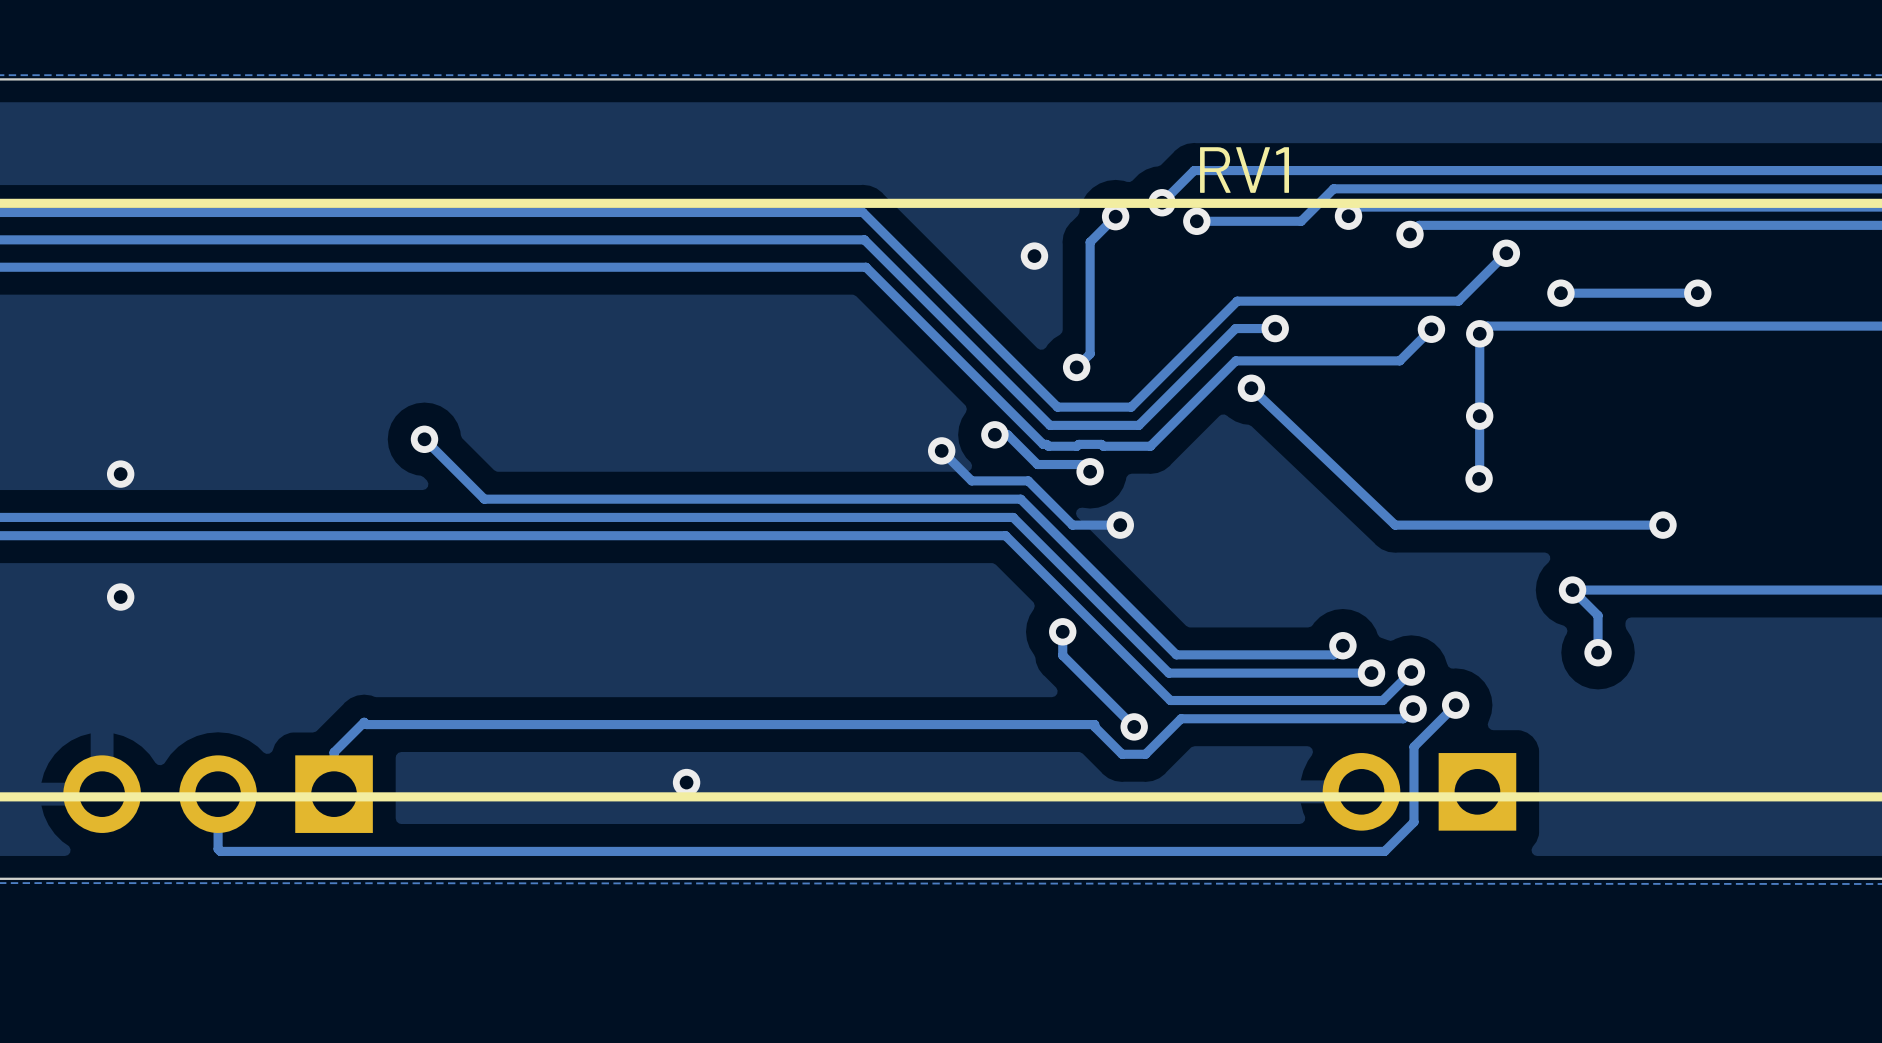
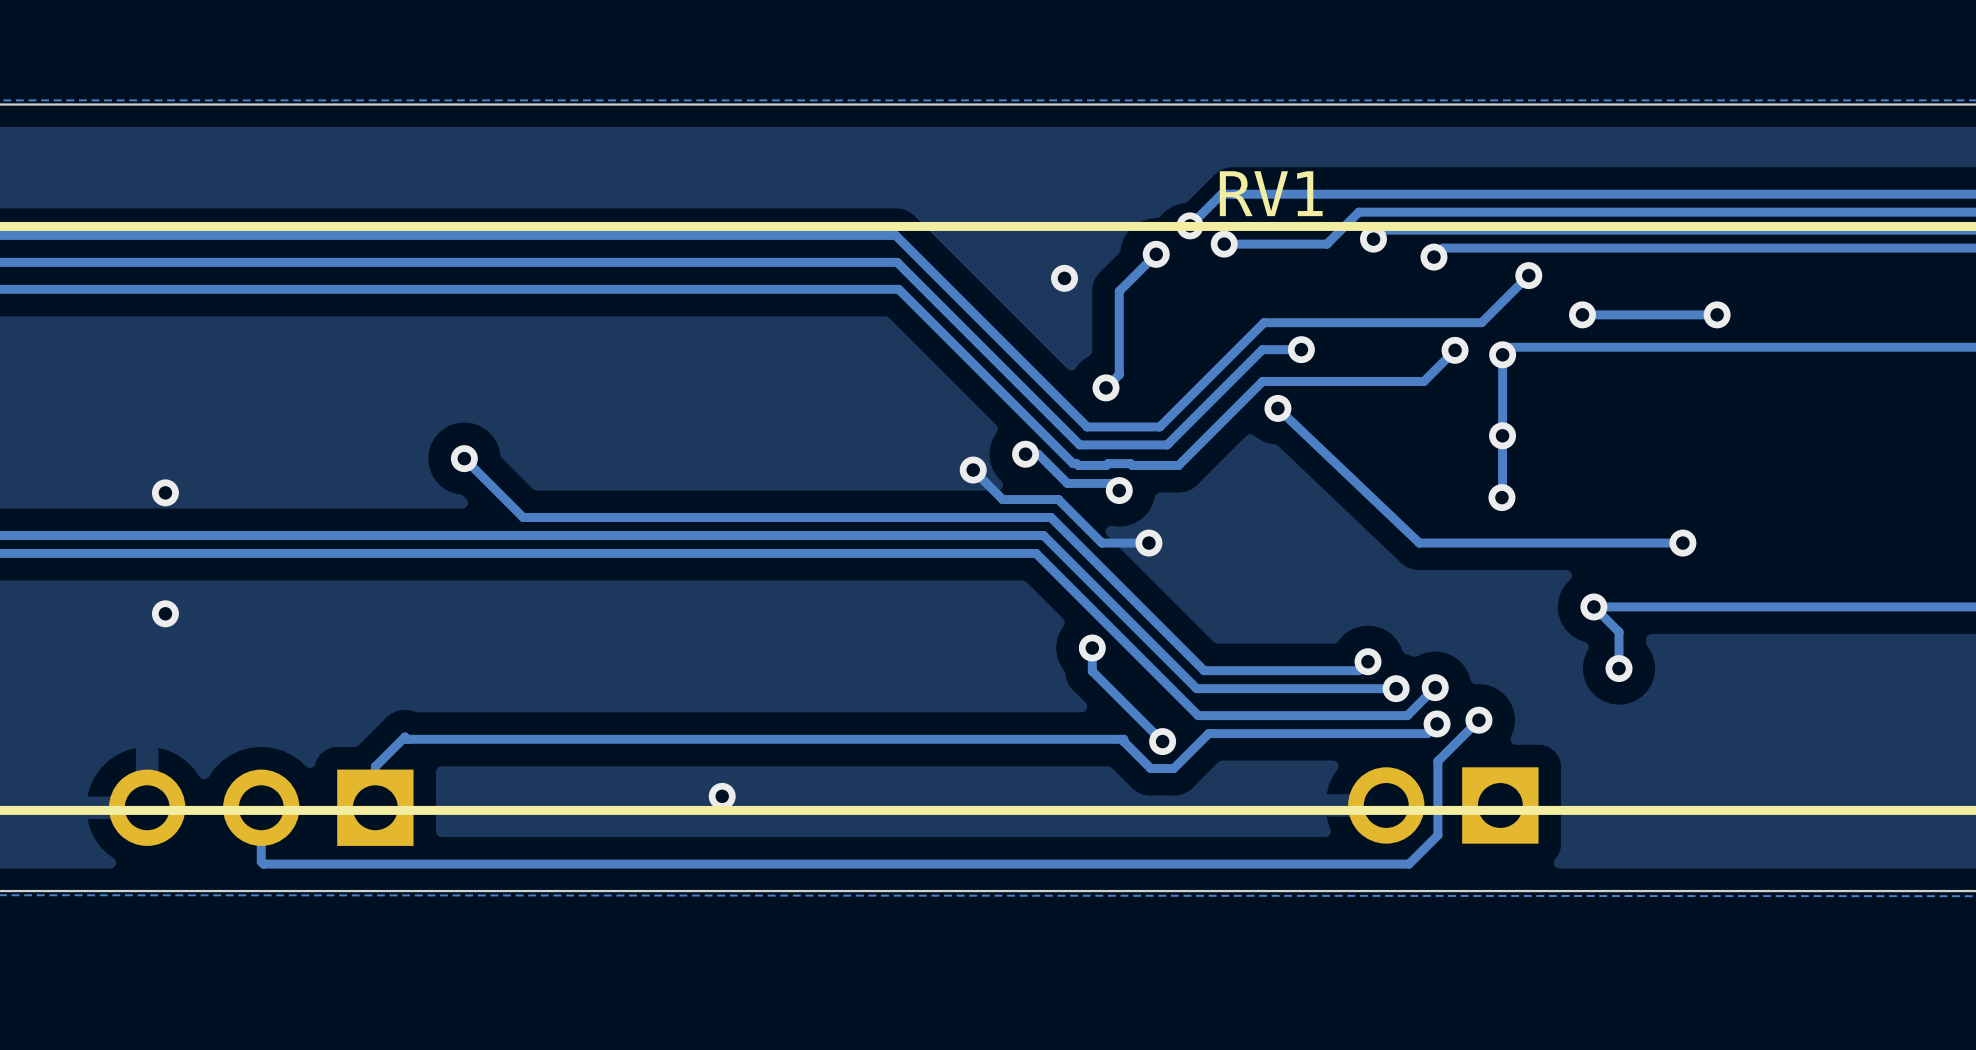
track: (1115, 216) (1090, 242) (1090, 269) -> (1156, 254) (1119, 291)
via position: (1115, 216) -> (1156, 254)

